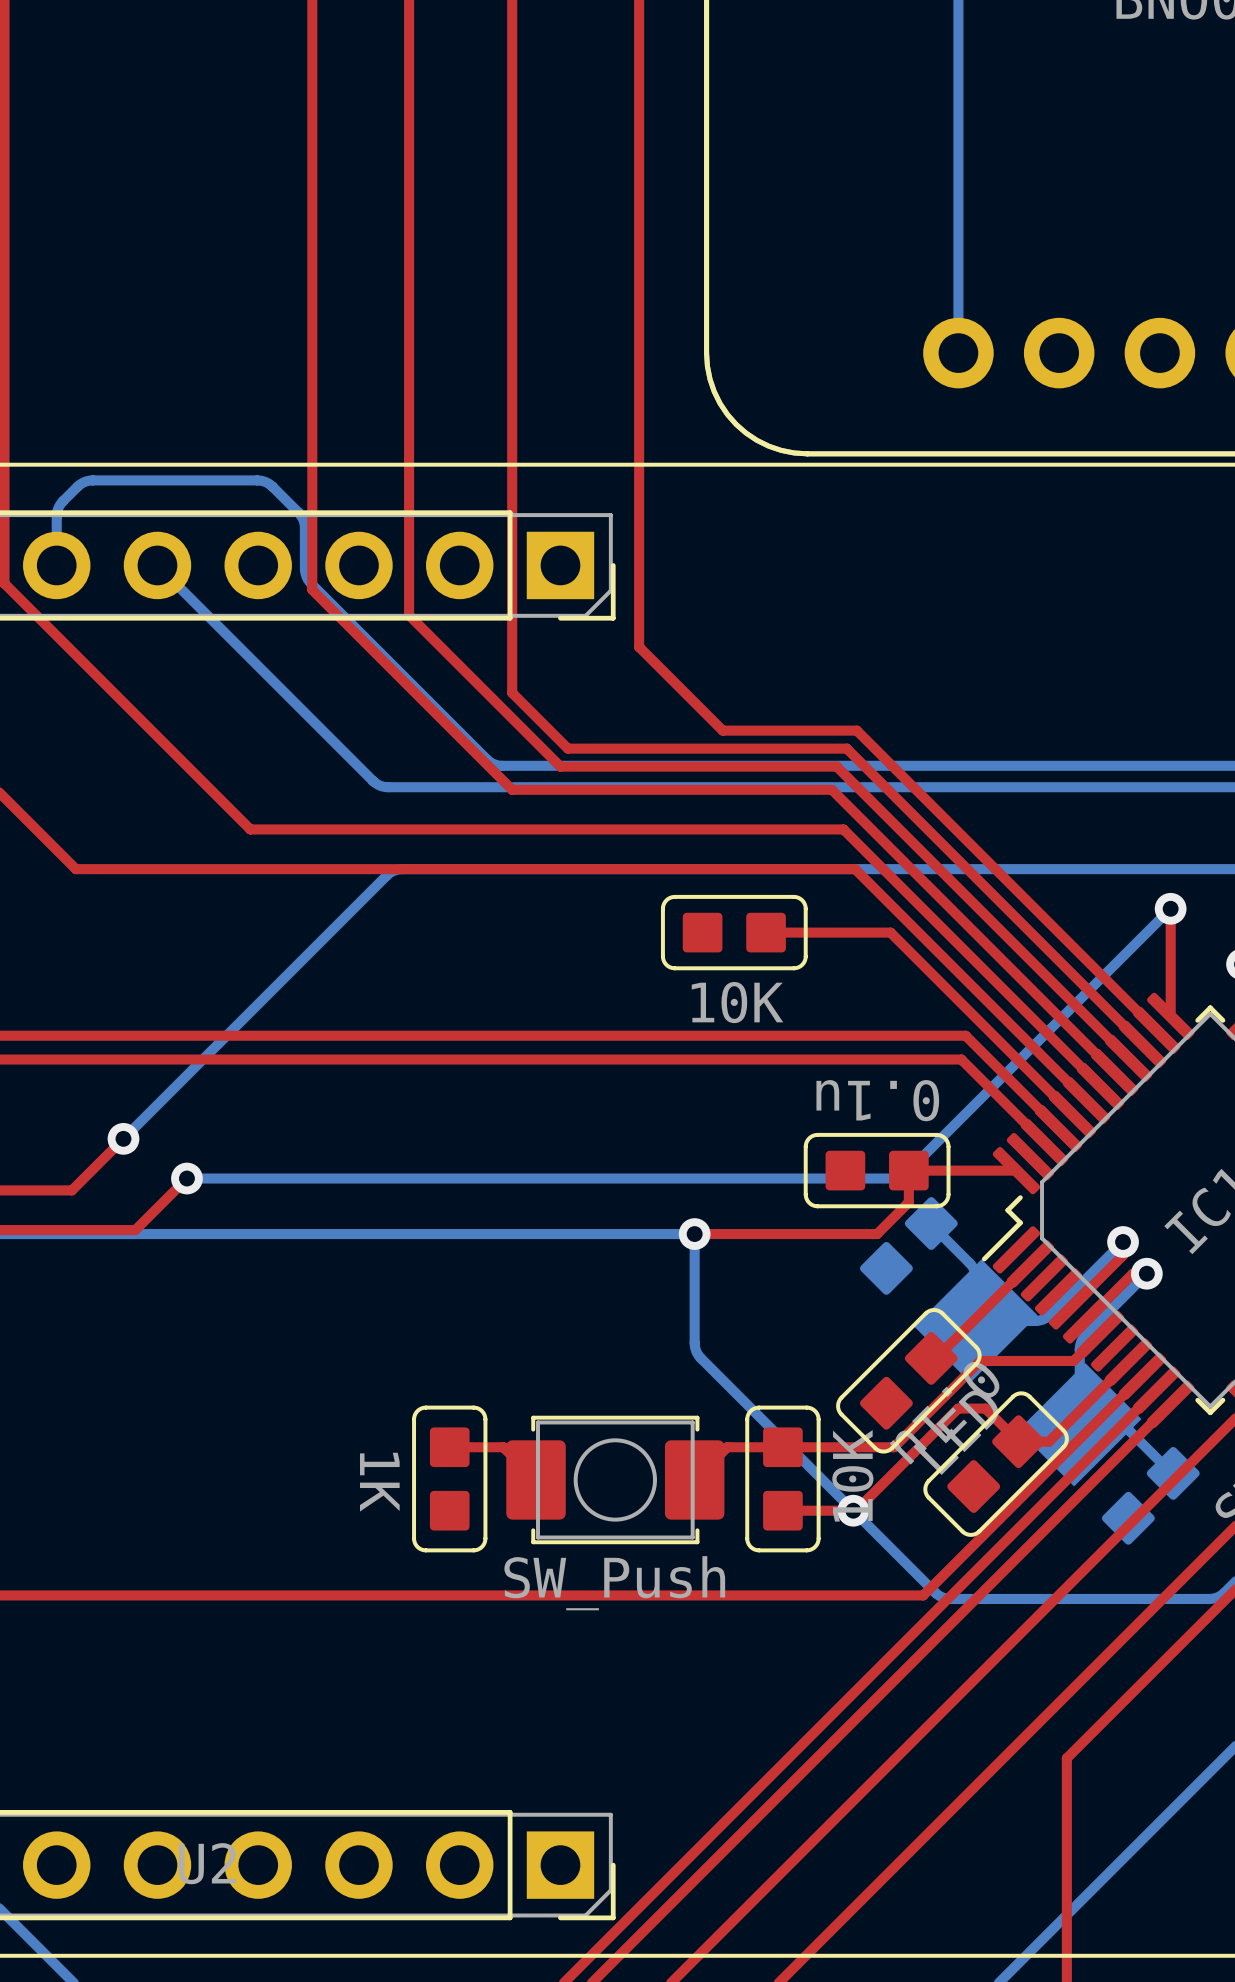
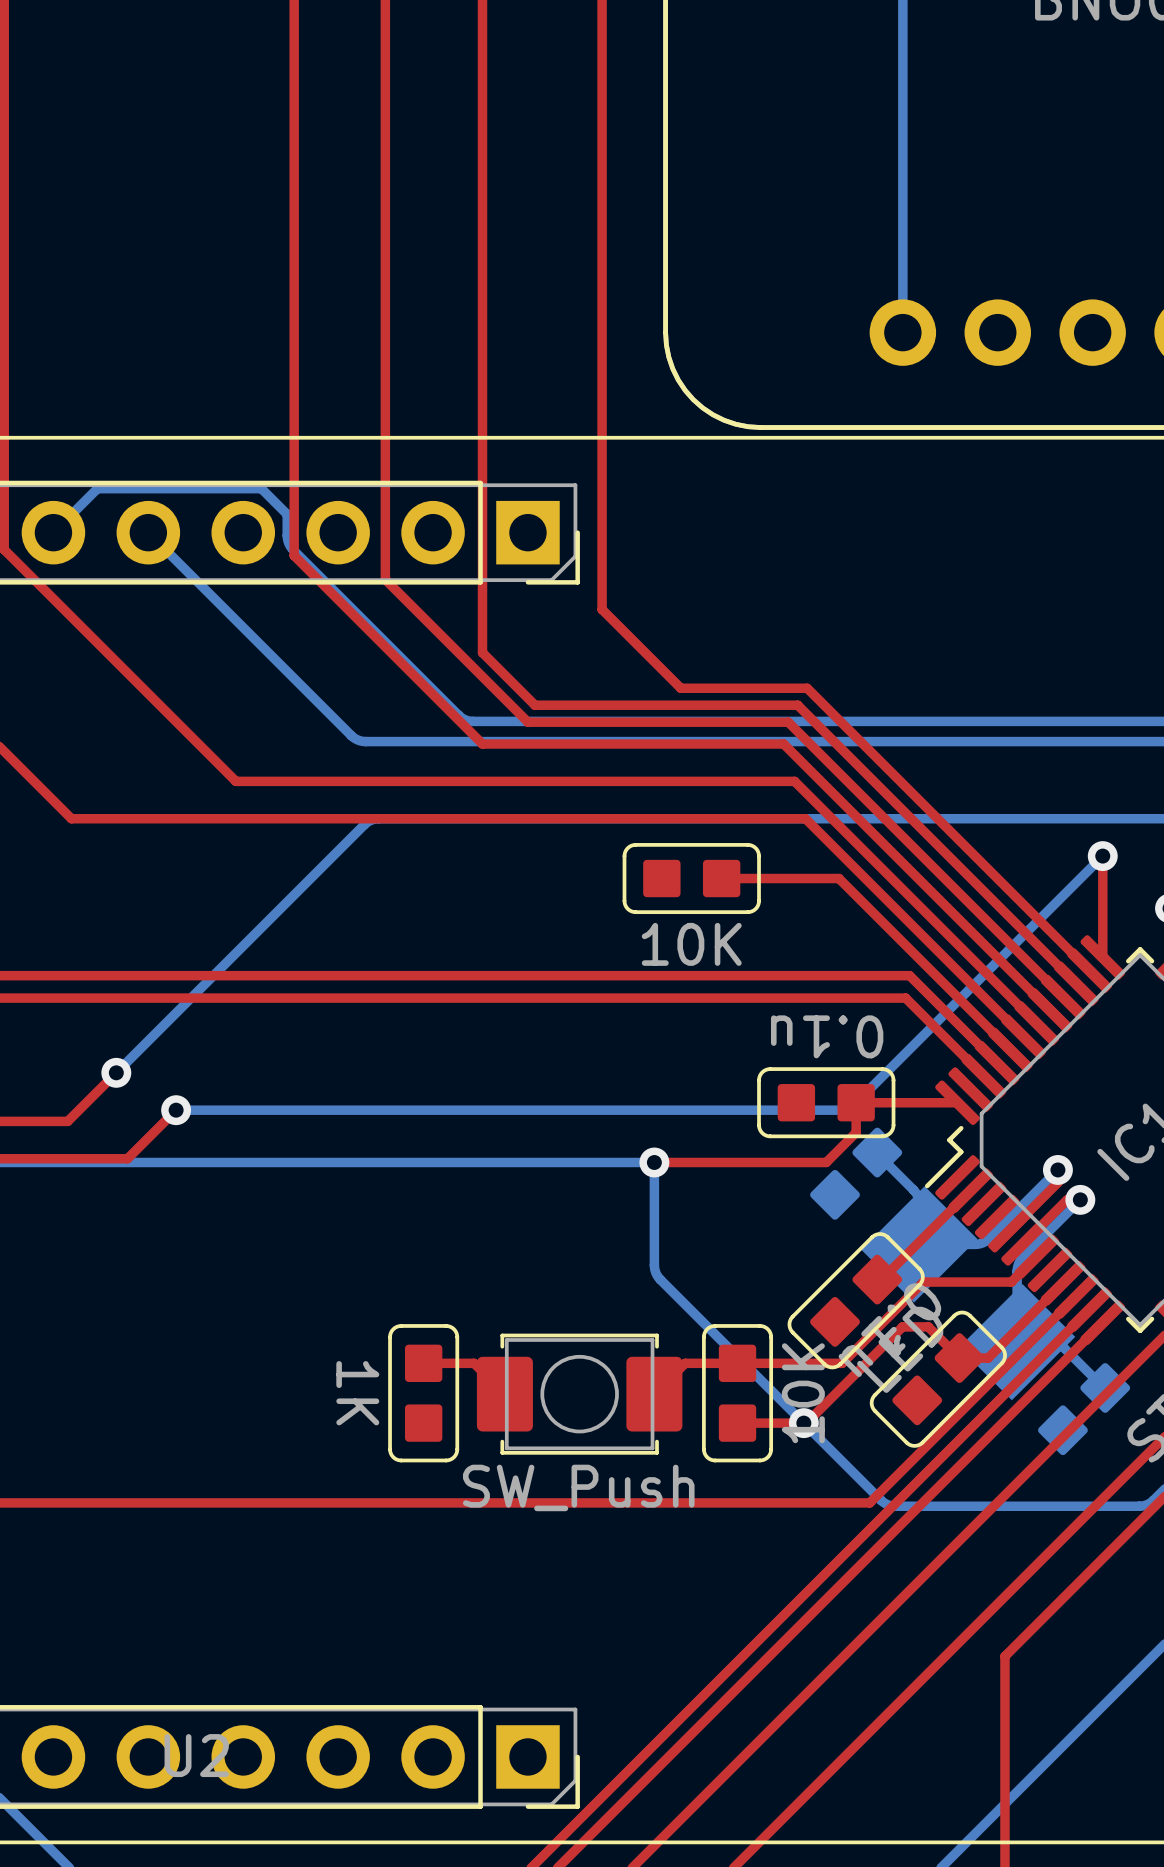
bottom track: (304, 546) (304, 525) (302, 517) (272, 486) (262, 481) (90, 480) (79, 485) (58, 508) (56, 565) -> (287, 514) (261, 488) (97, 488) (53, 532)

